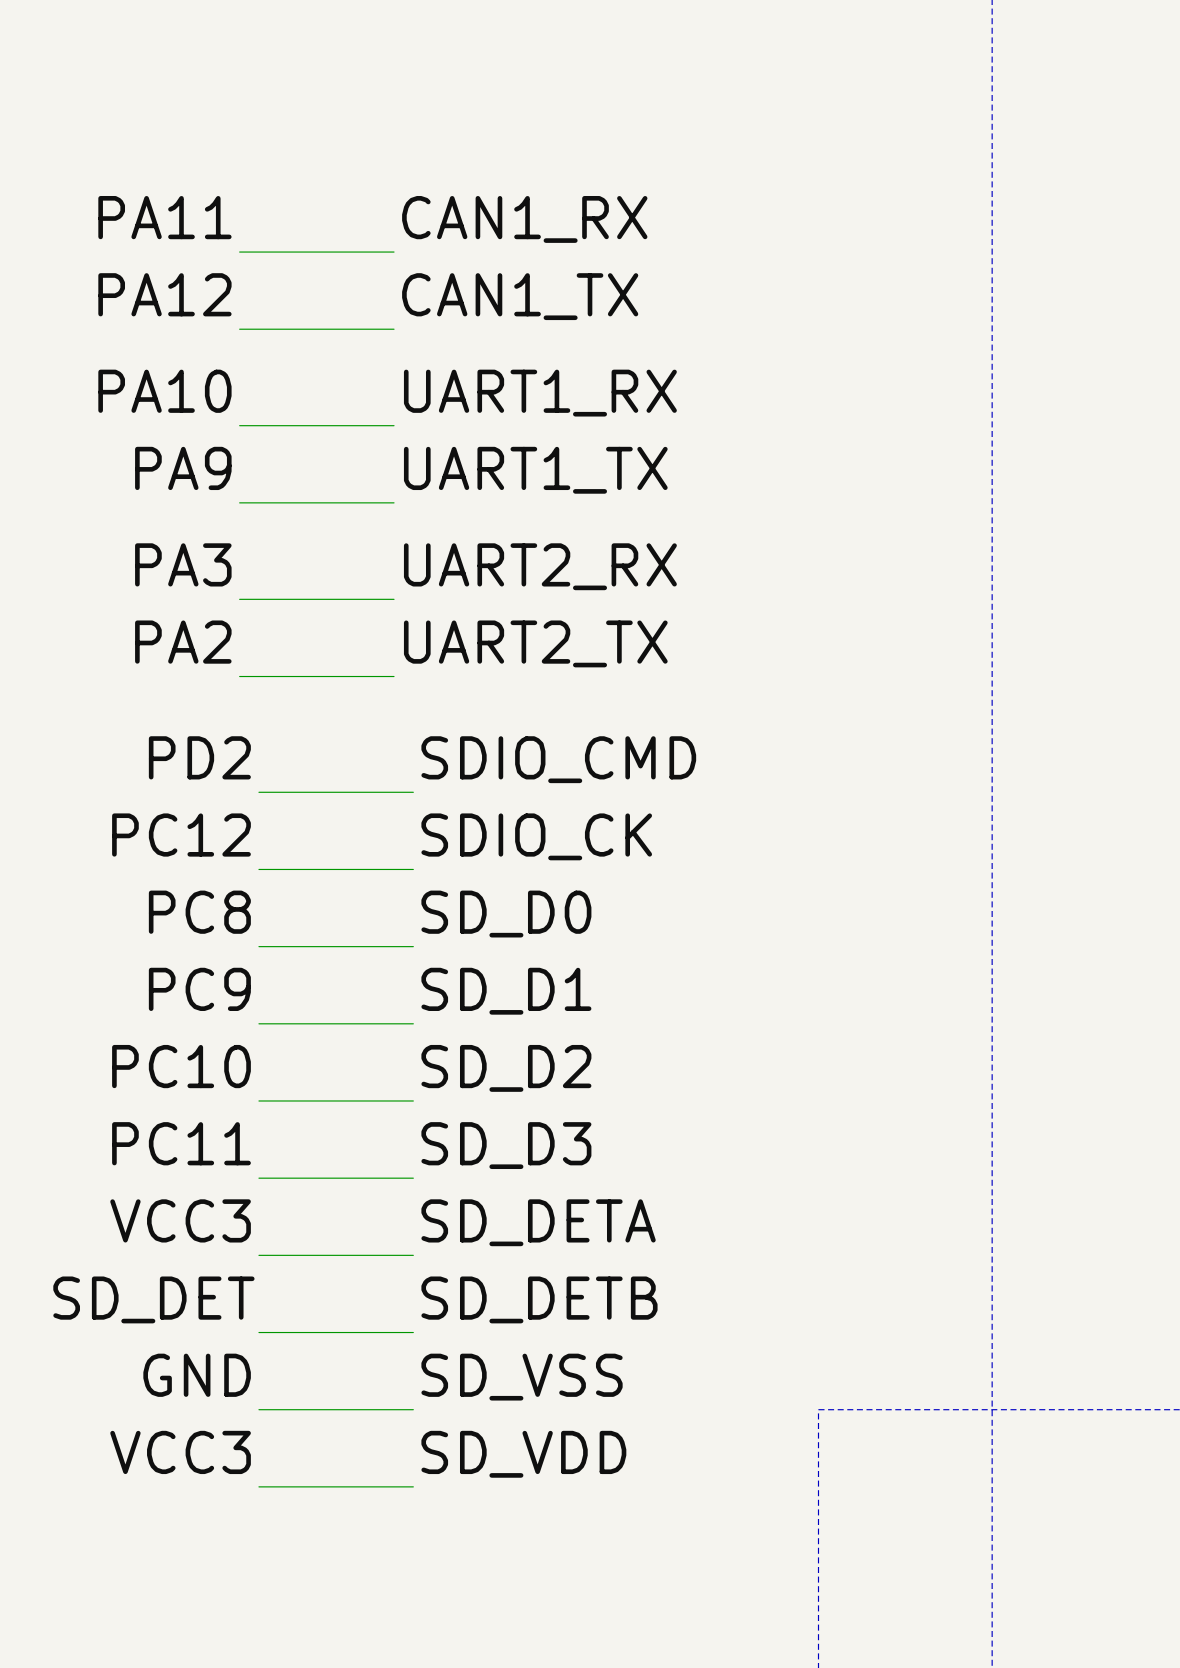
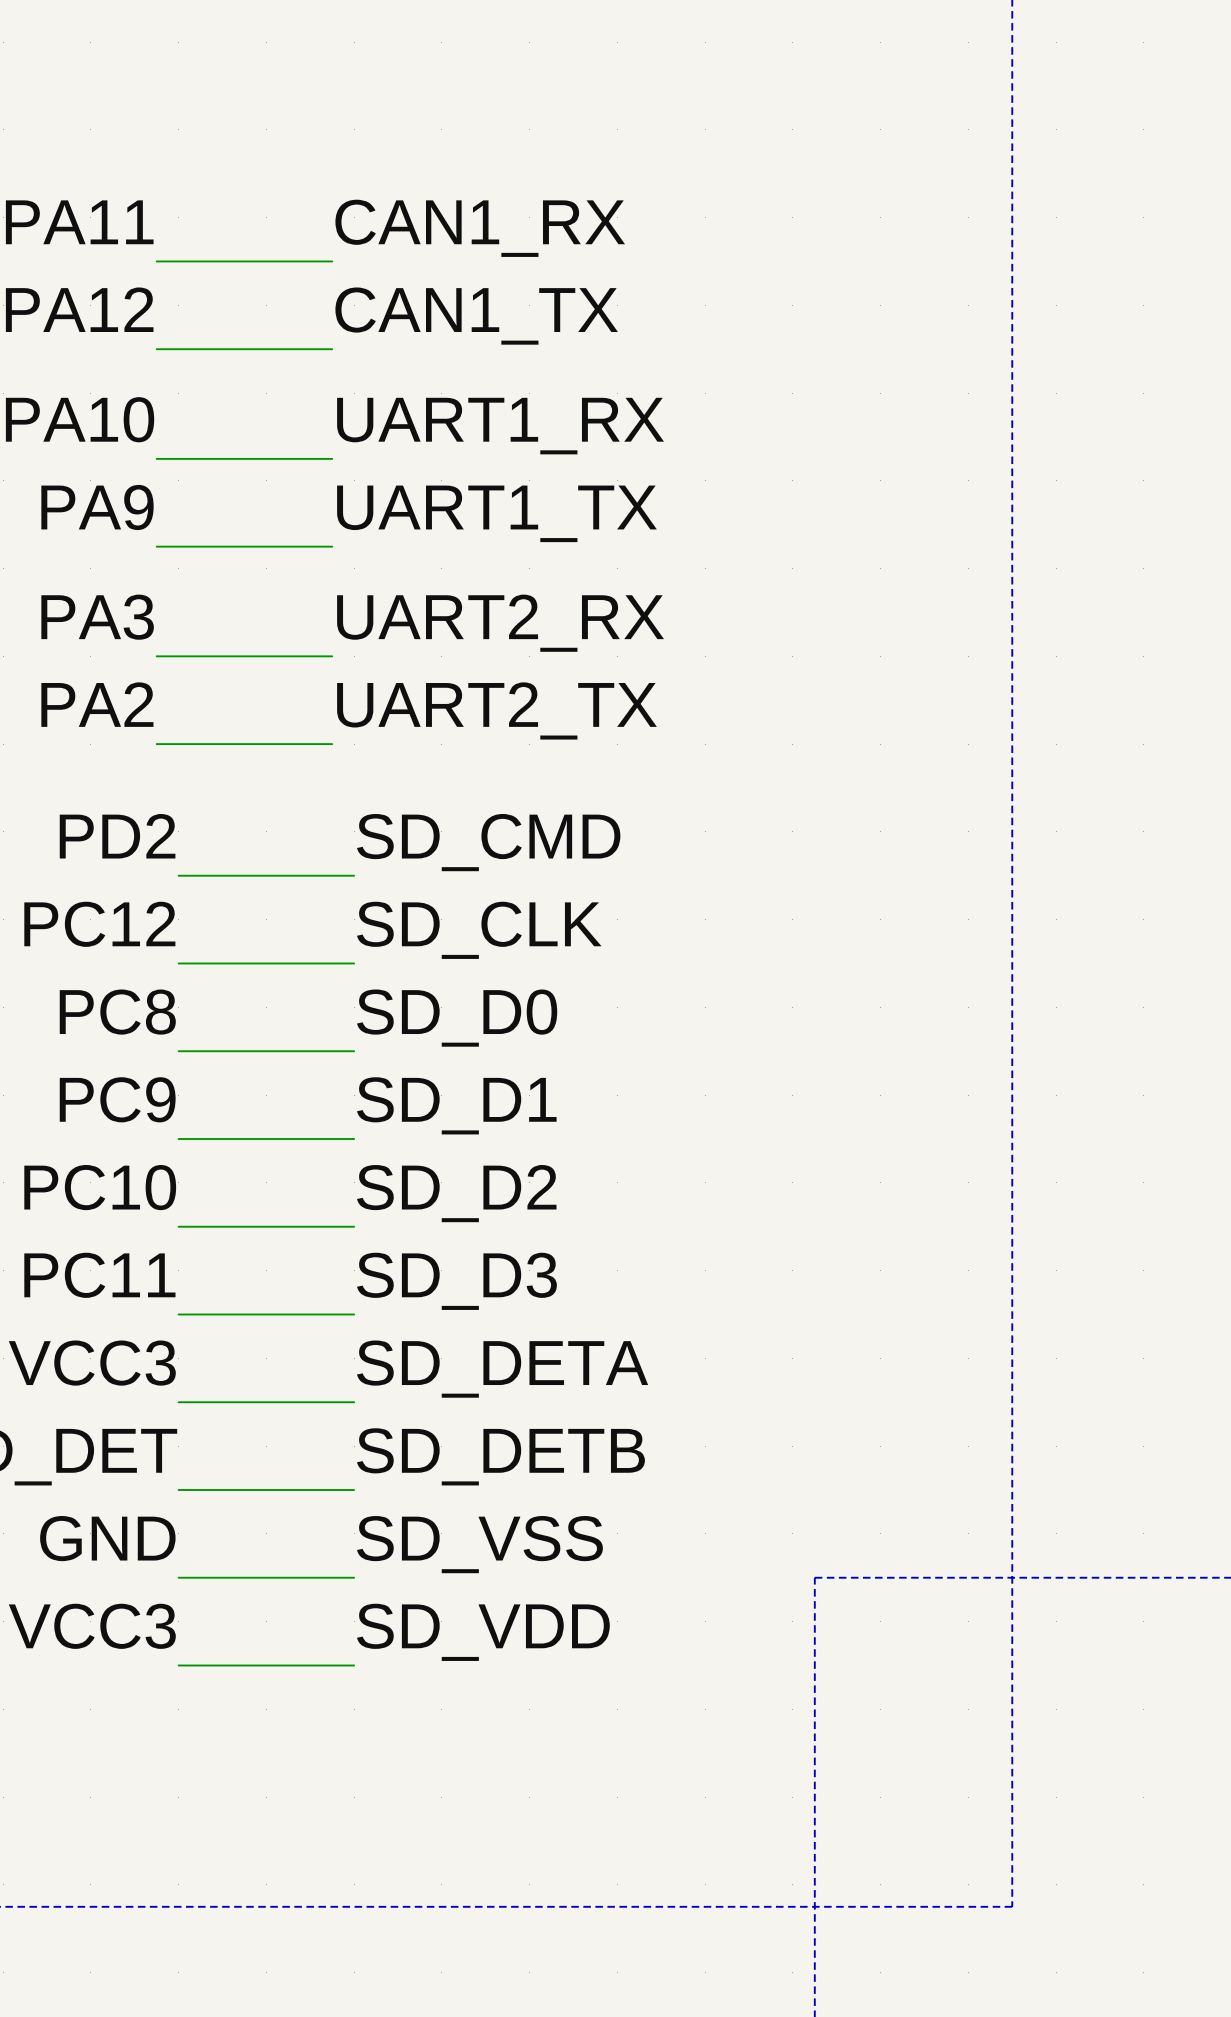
label: SDIO_CMD (558, 759) -> SD_CMD (488, 842)
label: SDIO_CK (536, 836) -> SD_CLK (479, 930)

